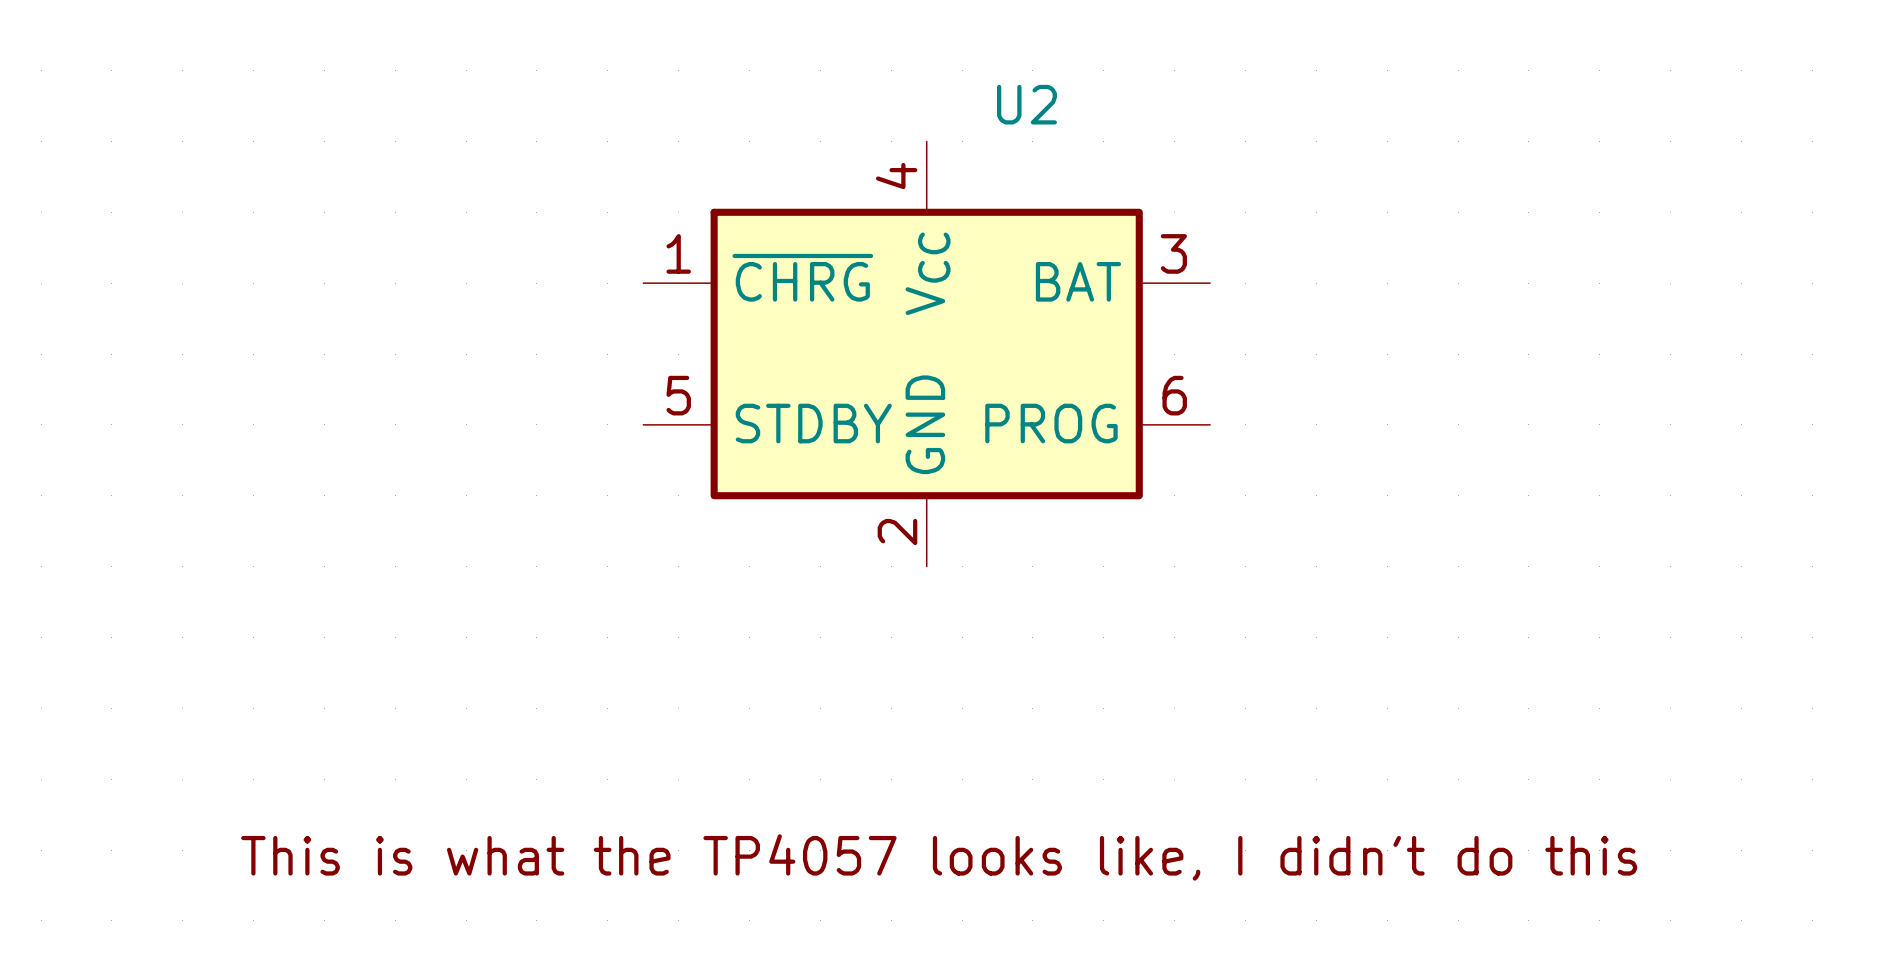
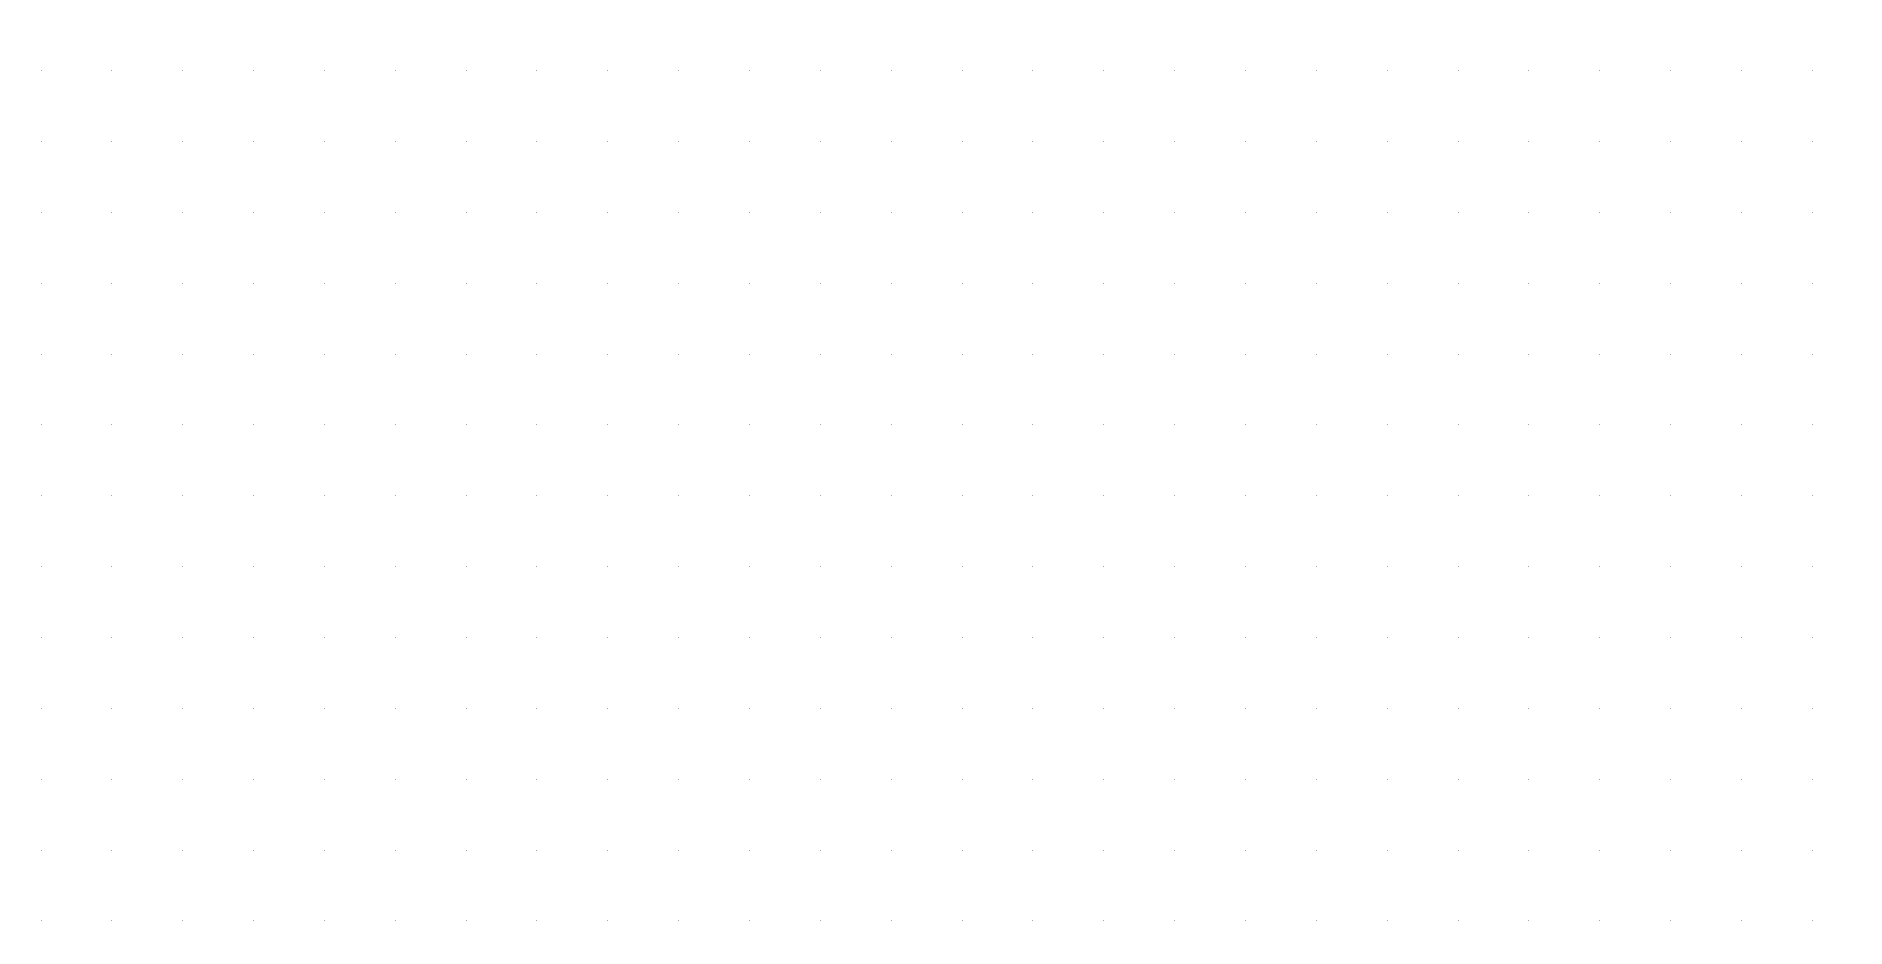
U2: (926, 354) -> none

